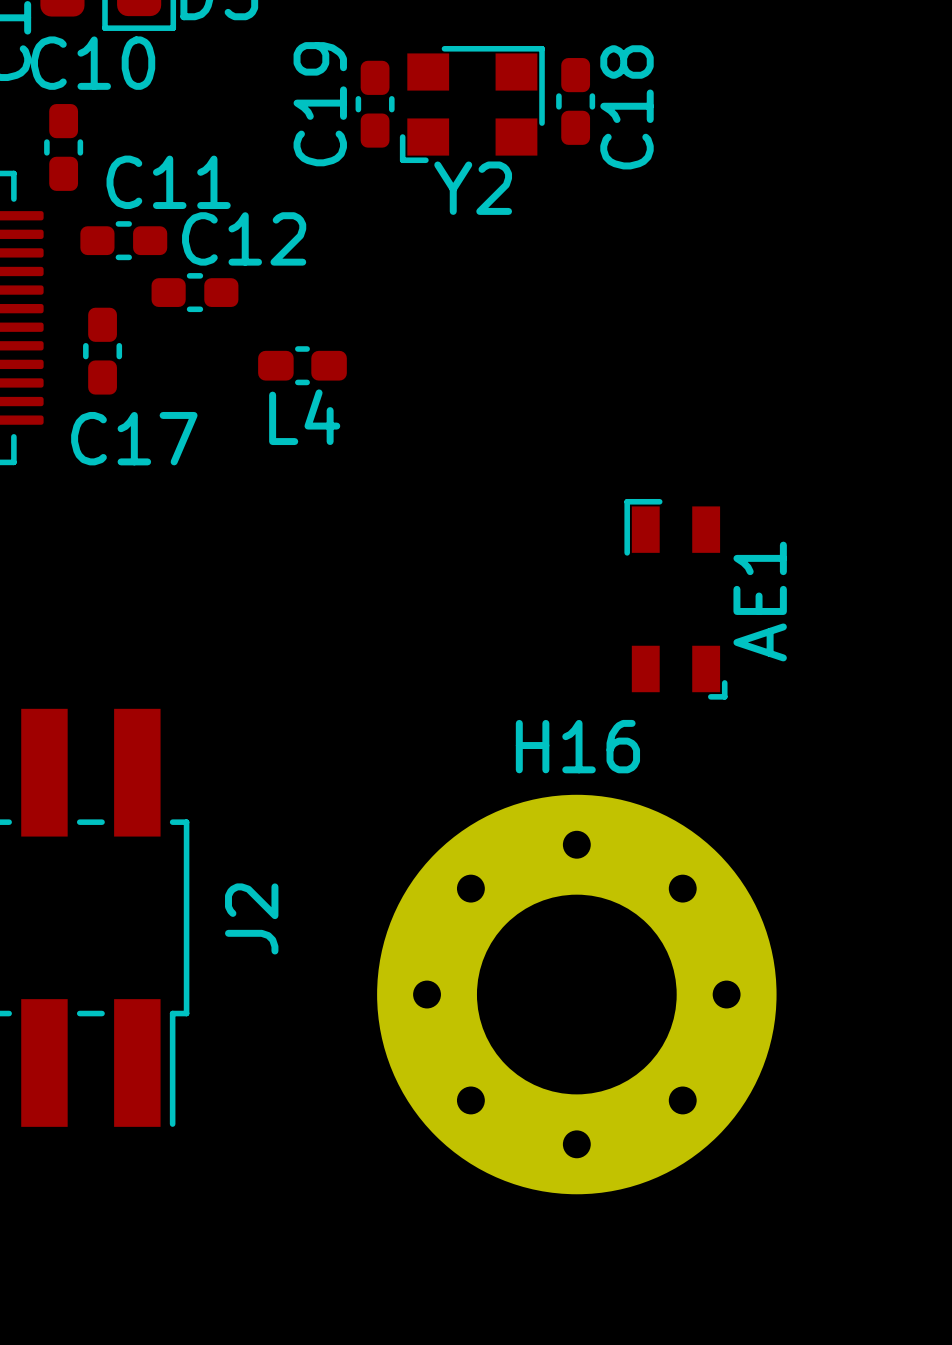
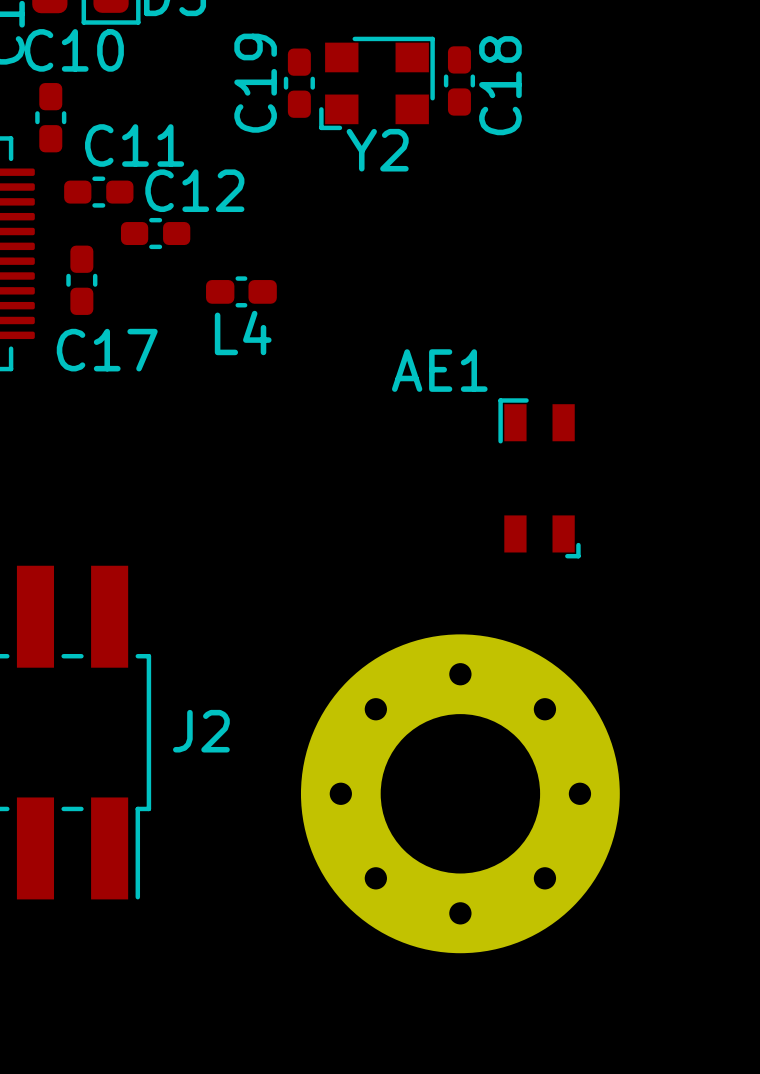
AE1 name rotation: 0° (760, 601) -> 90° clockwise (439, 370)
AE1 name position: AE1 (760, 601) -> AE1 (439, 370)
H16 name: H16 (577, 746) -> none
J2 name rotation: 0° (251, 918) -> 90° clockwise (201, 731)

